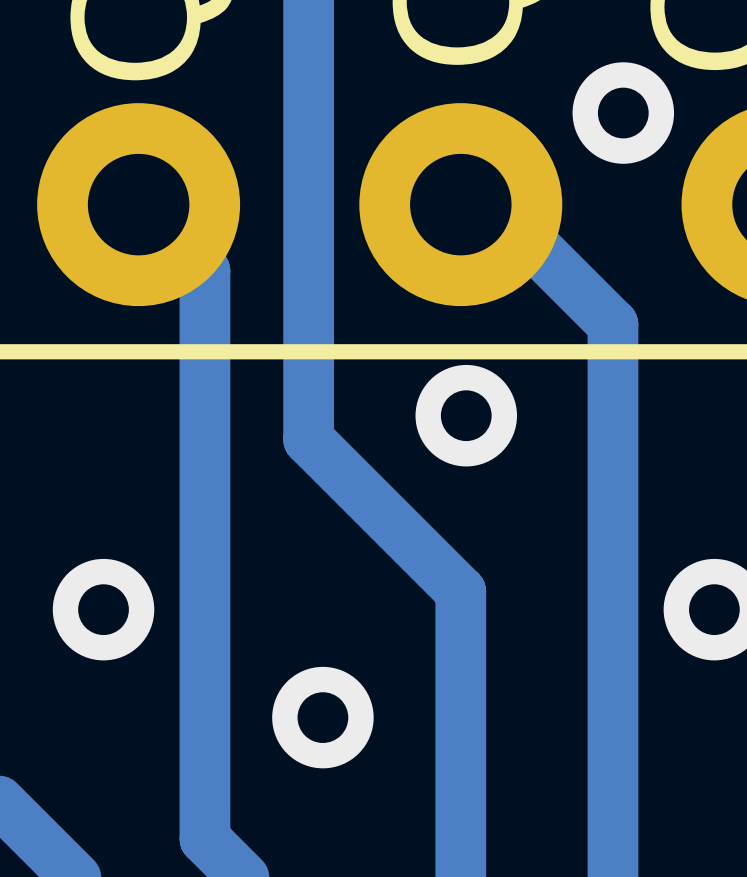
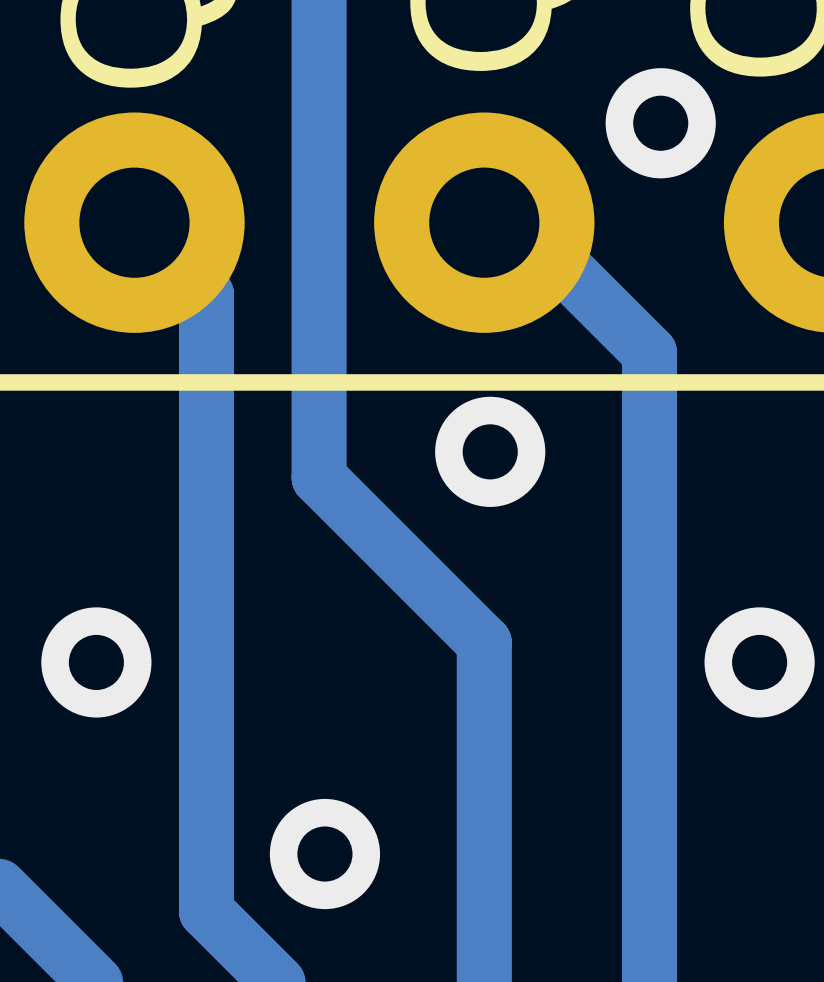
via position: (322, 717) -> (324, 854)

